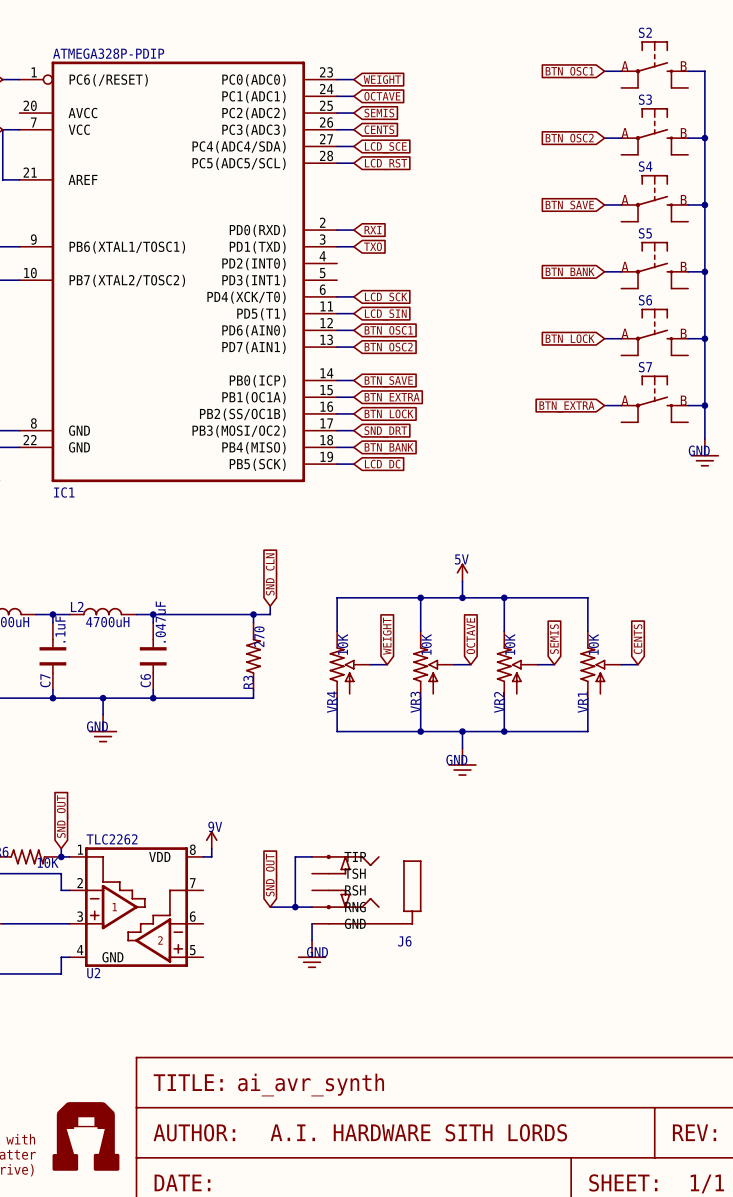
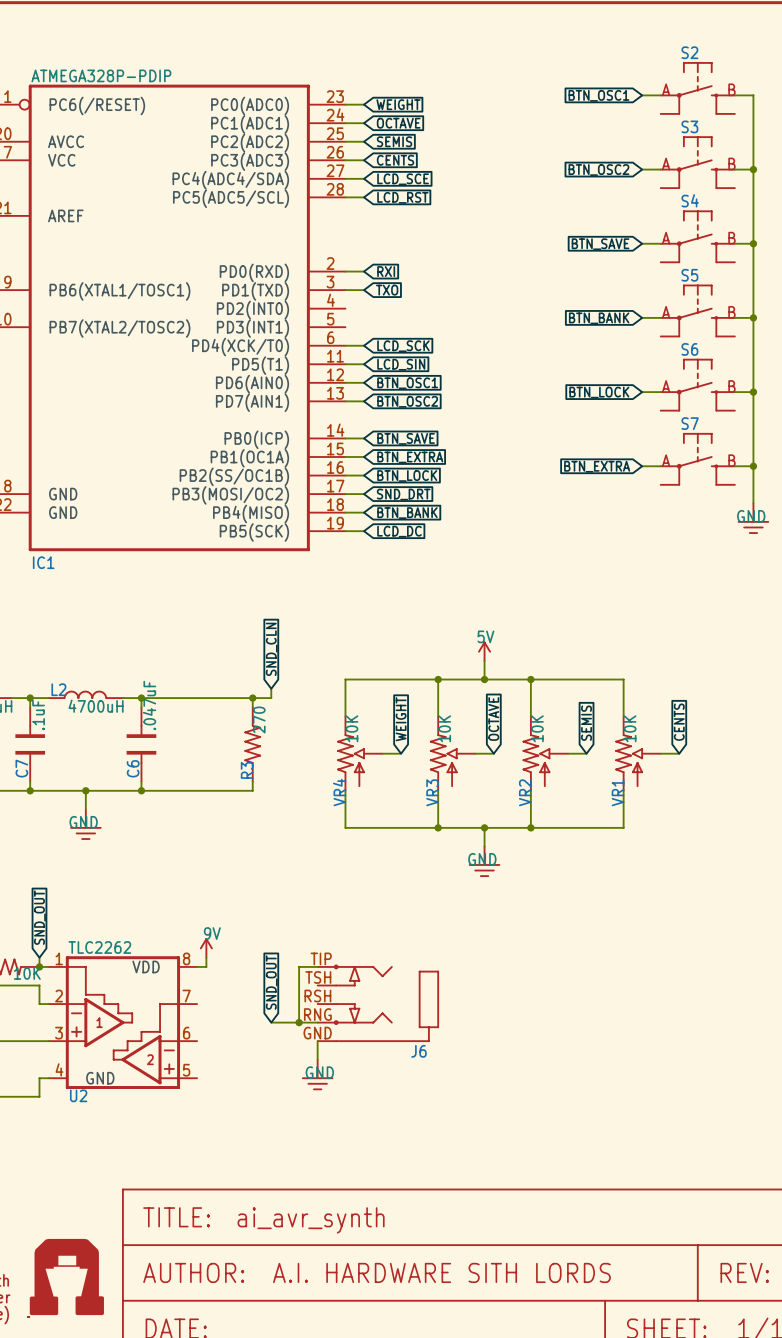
J6 symbol: [312, 854, 422, 925] -> [317, 964, 440, 1043]

